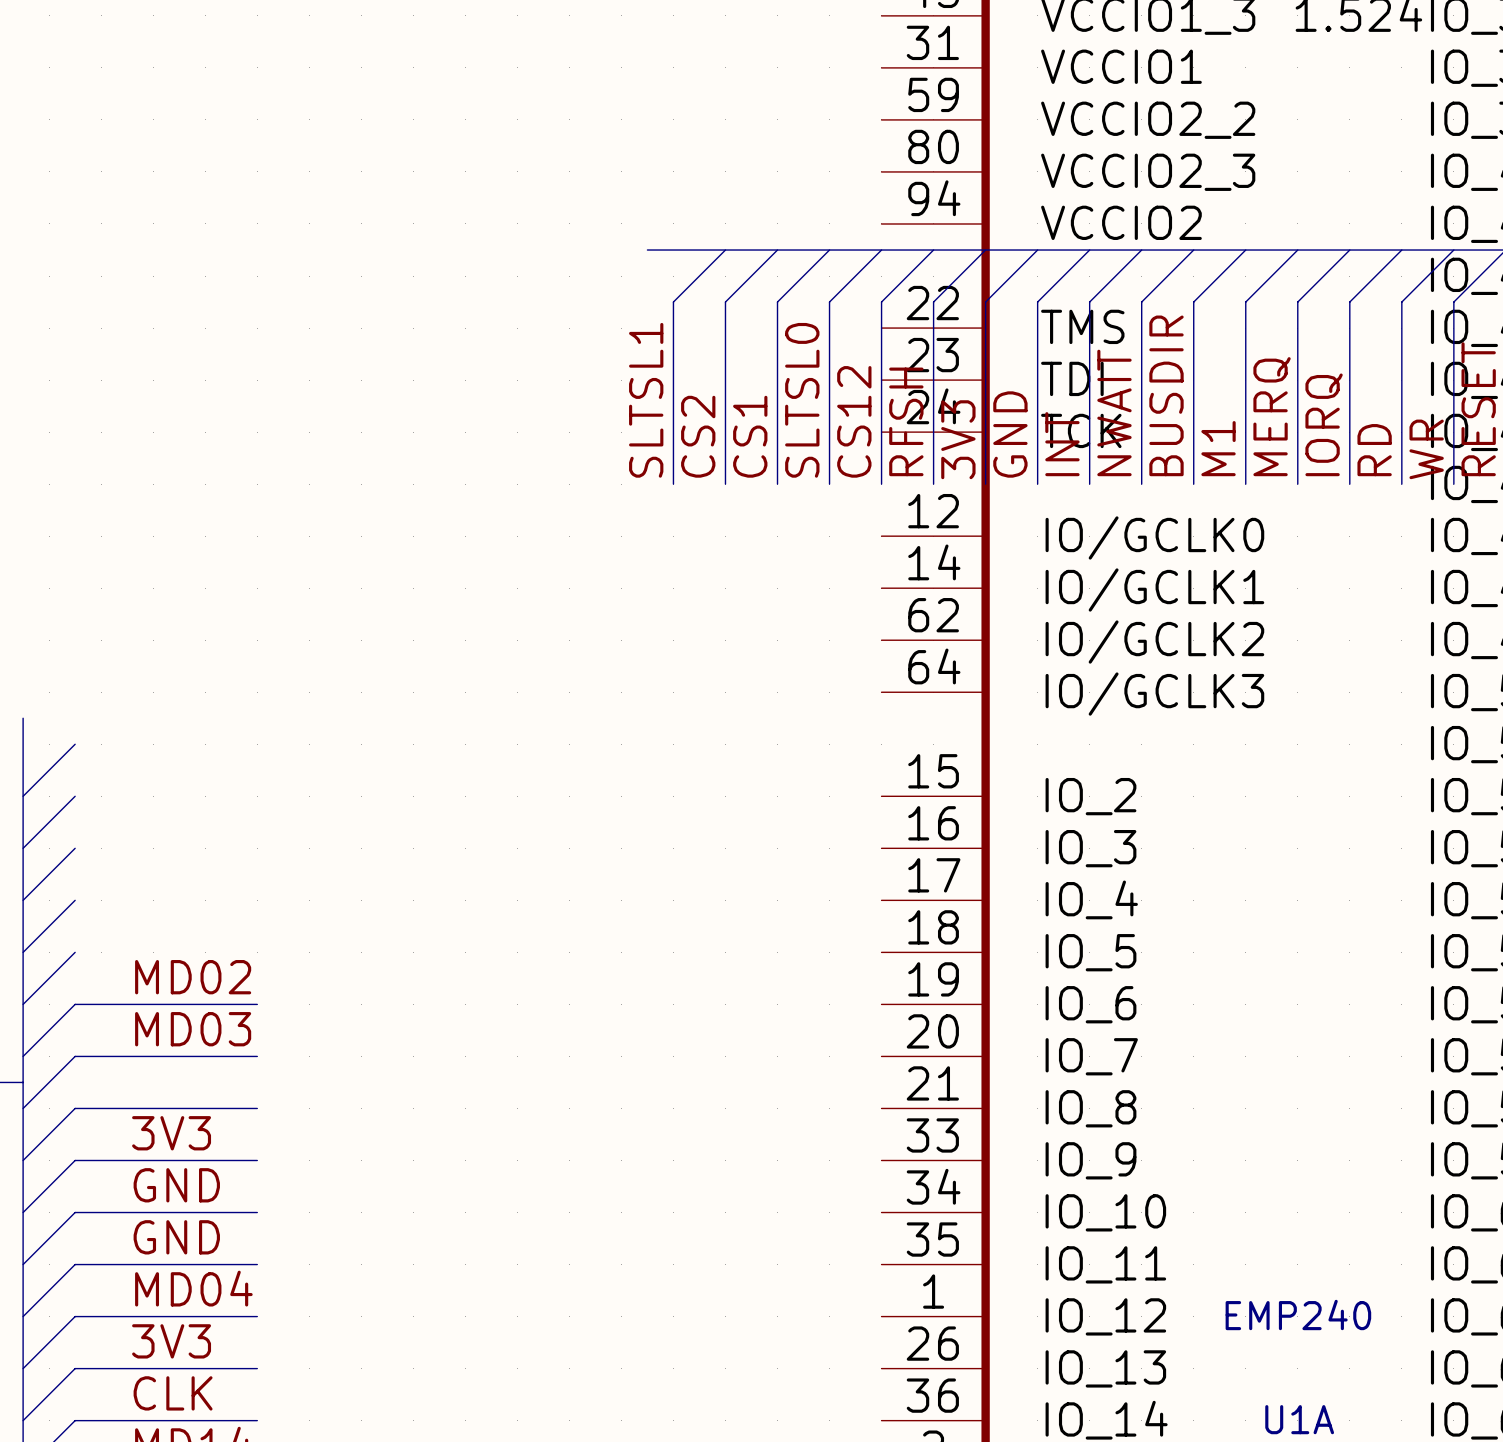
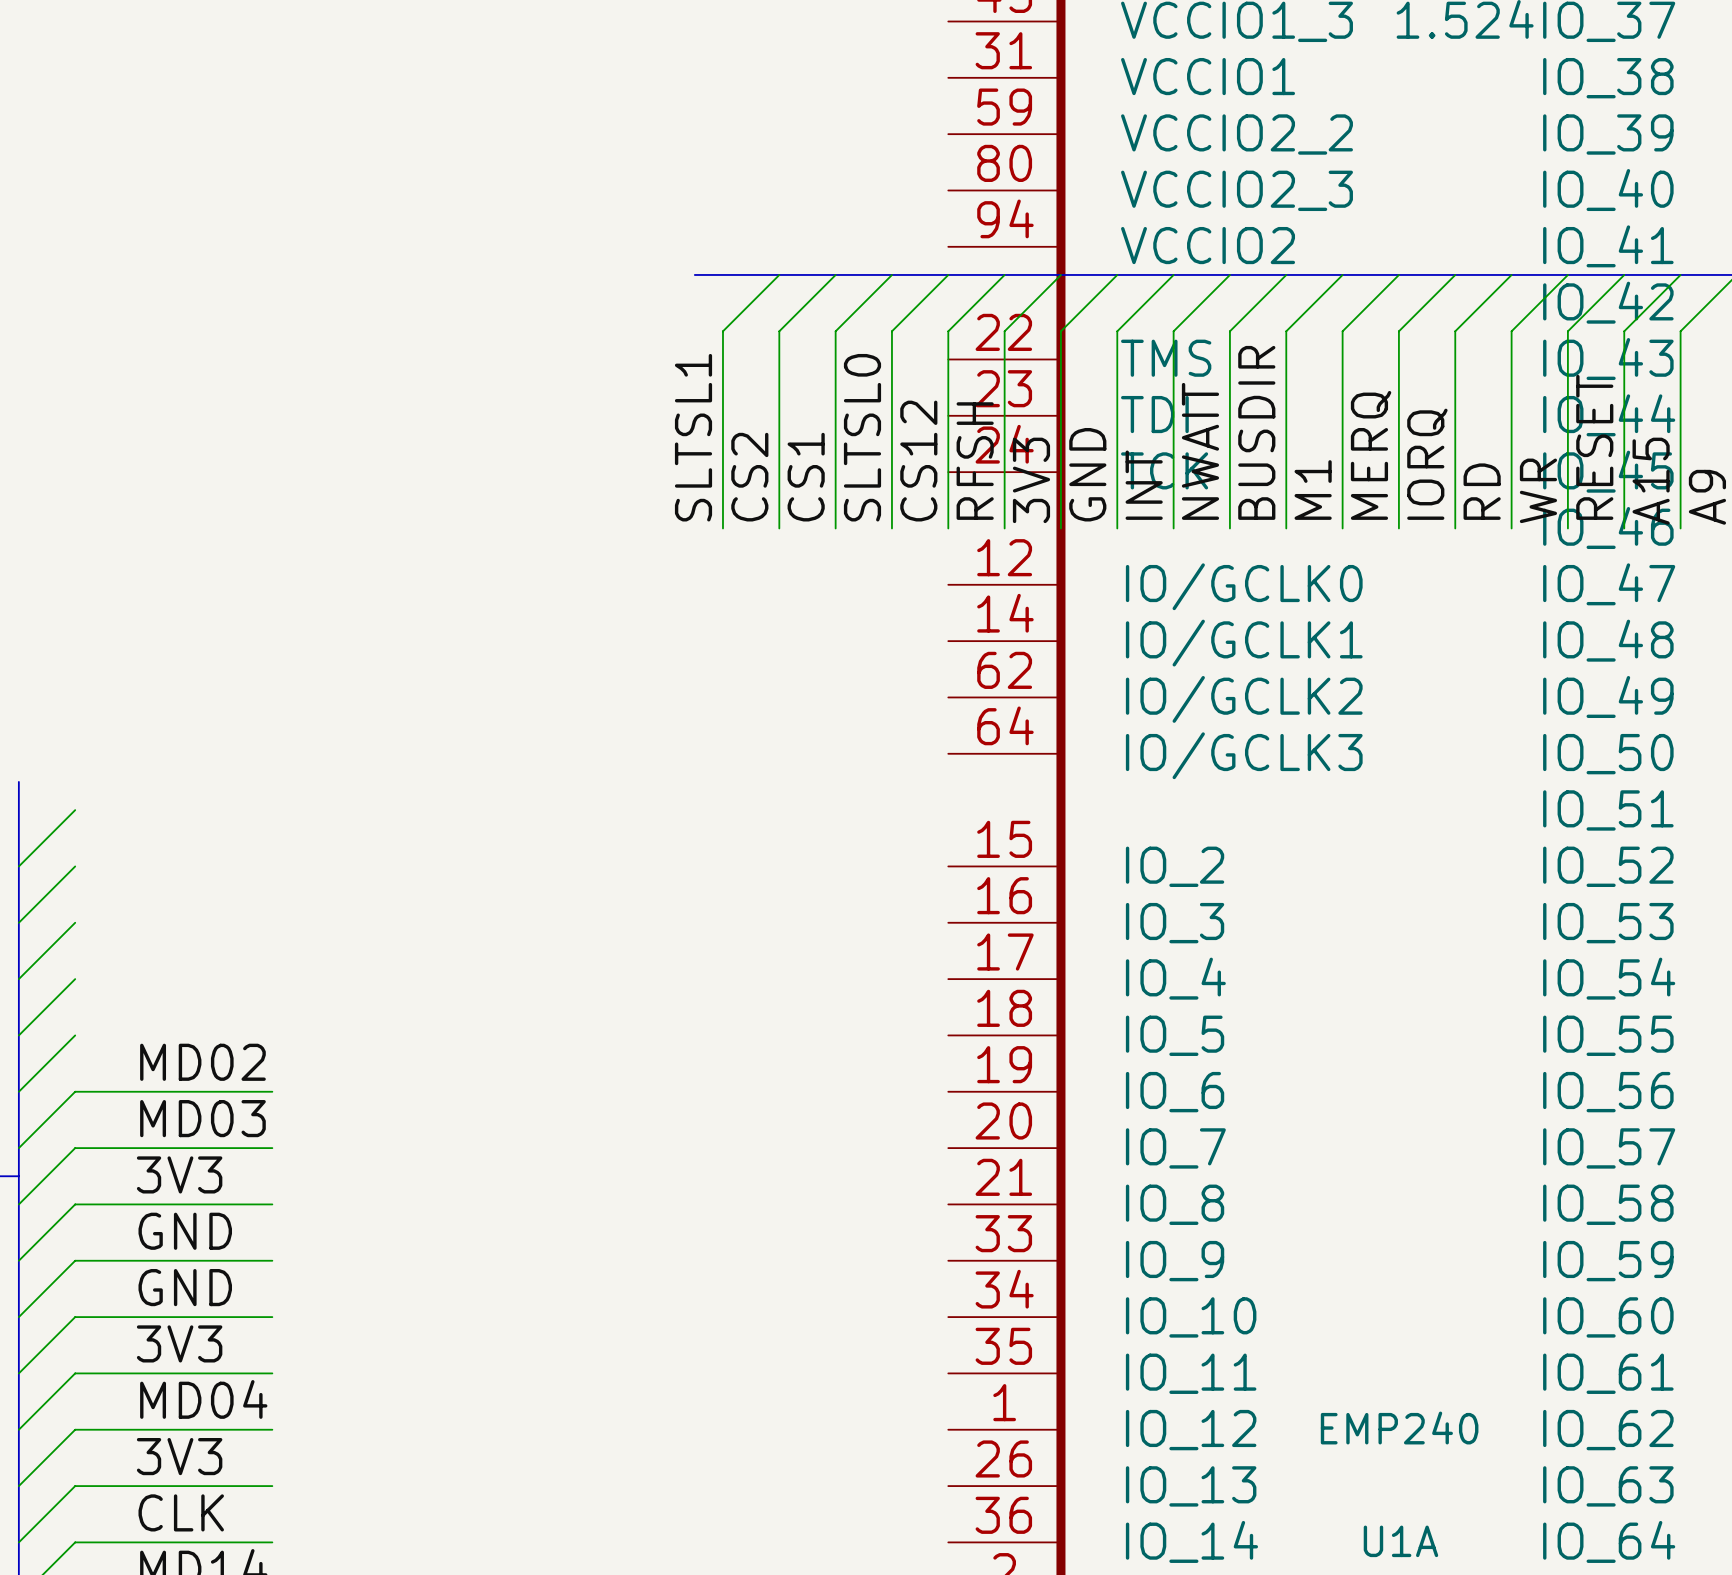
label: none -> 3V3 (179, 1174)
label: 3V3 (171, 1133) -> GND (185, 1231)
label: GND (176, 1237) -> 3V3 (179, 1343)

